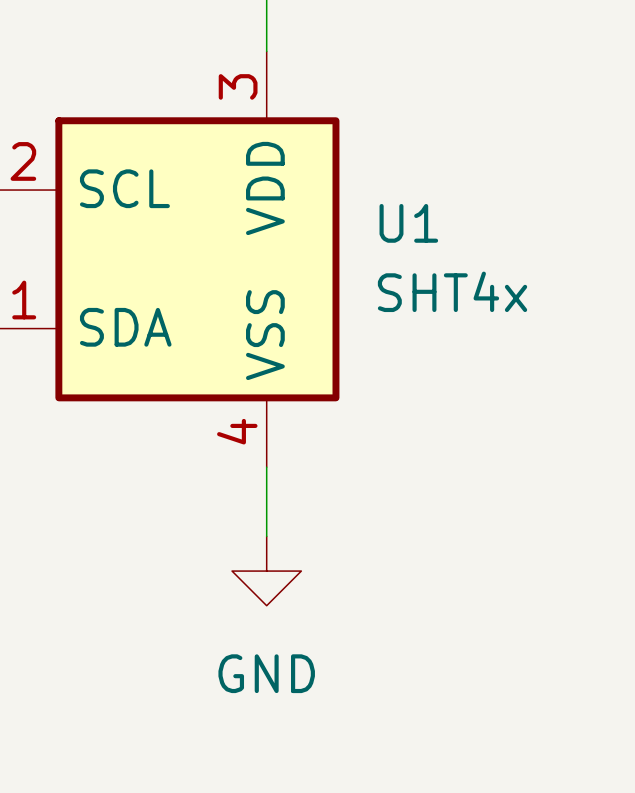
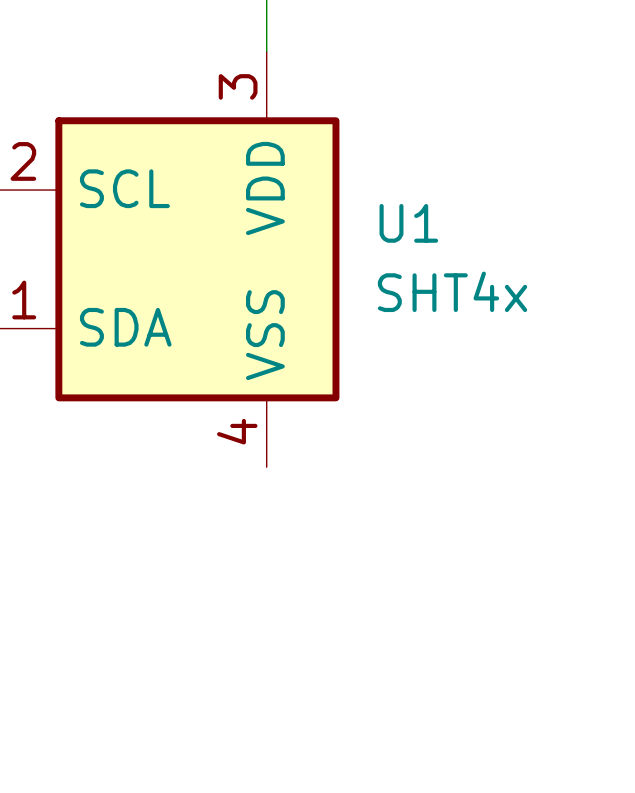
wire: (266, 467) (266, 536) -> none
power symbol: GND (266, 571) -> none

